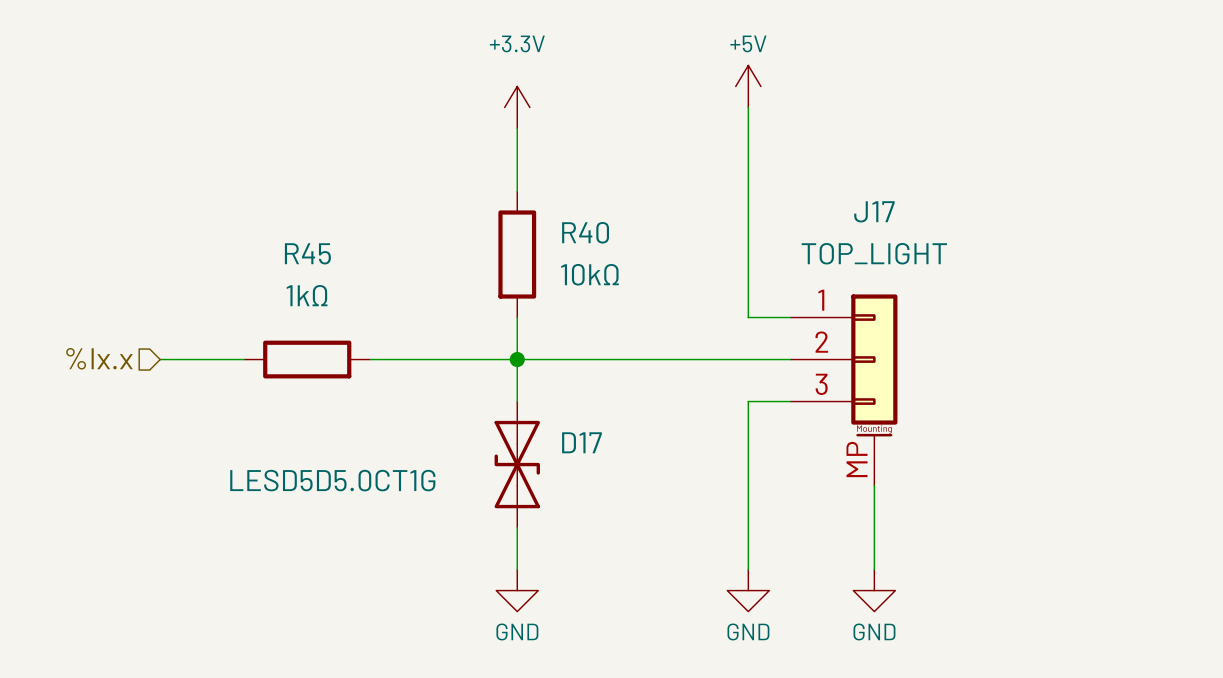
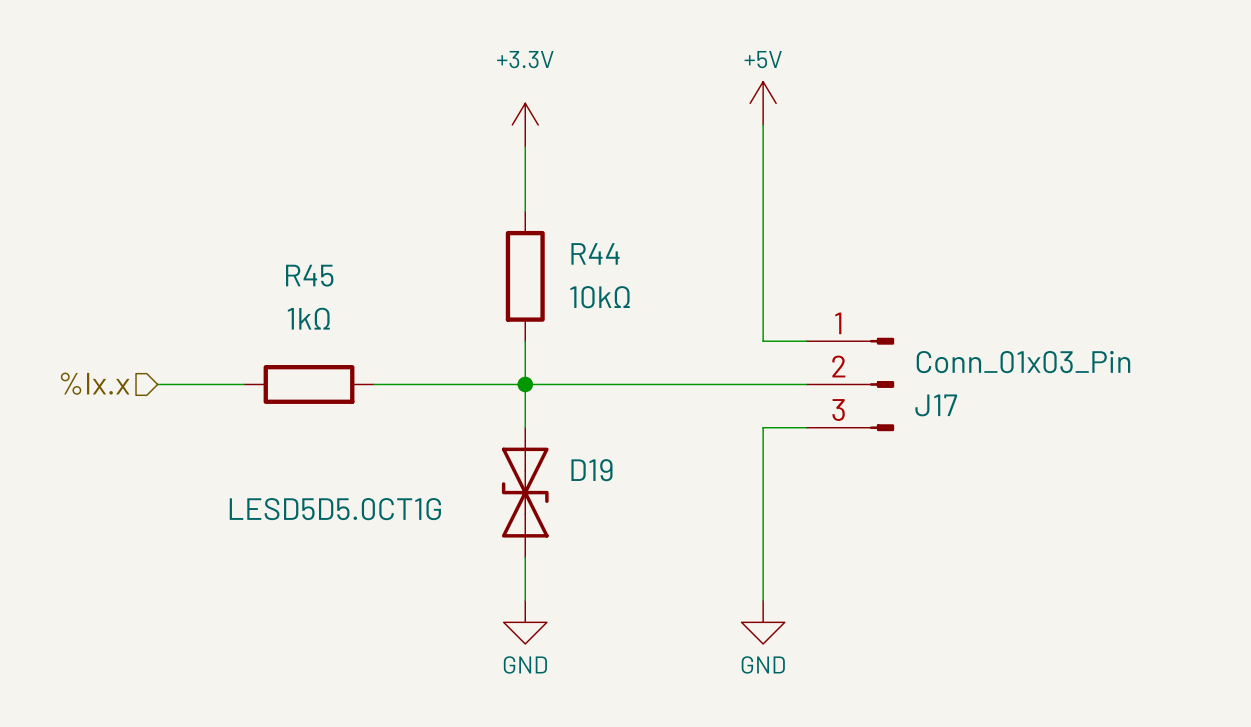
J17 name position: J17 (874, 211) -> J17 (936, 405)
R40 name: R40 (585, 232) -> R44 (595, 253)
J17 value: TOP_LIGHT (874, 253) -> Conn_01x03_Pin (1023, 362)
J17 symbol: [790, 294, 898, 486] -> [806, 337, 895, 432]
D17 name: D17 (581, 442) -> D19 (591, 470)
wire: (874, 485) (874, 569) -> none
power symbol: GND (874, 590) -> none

